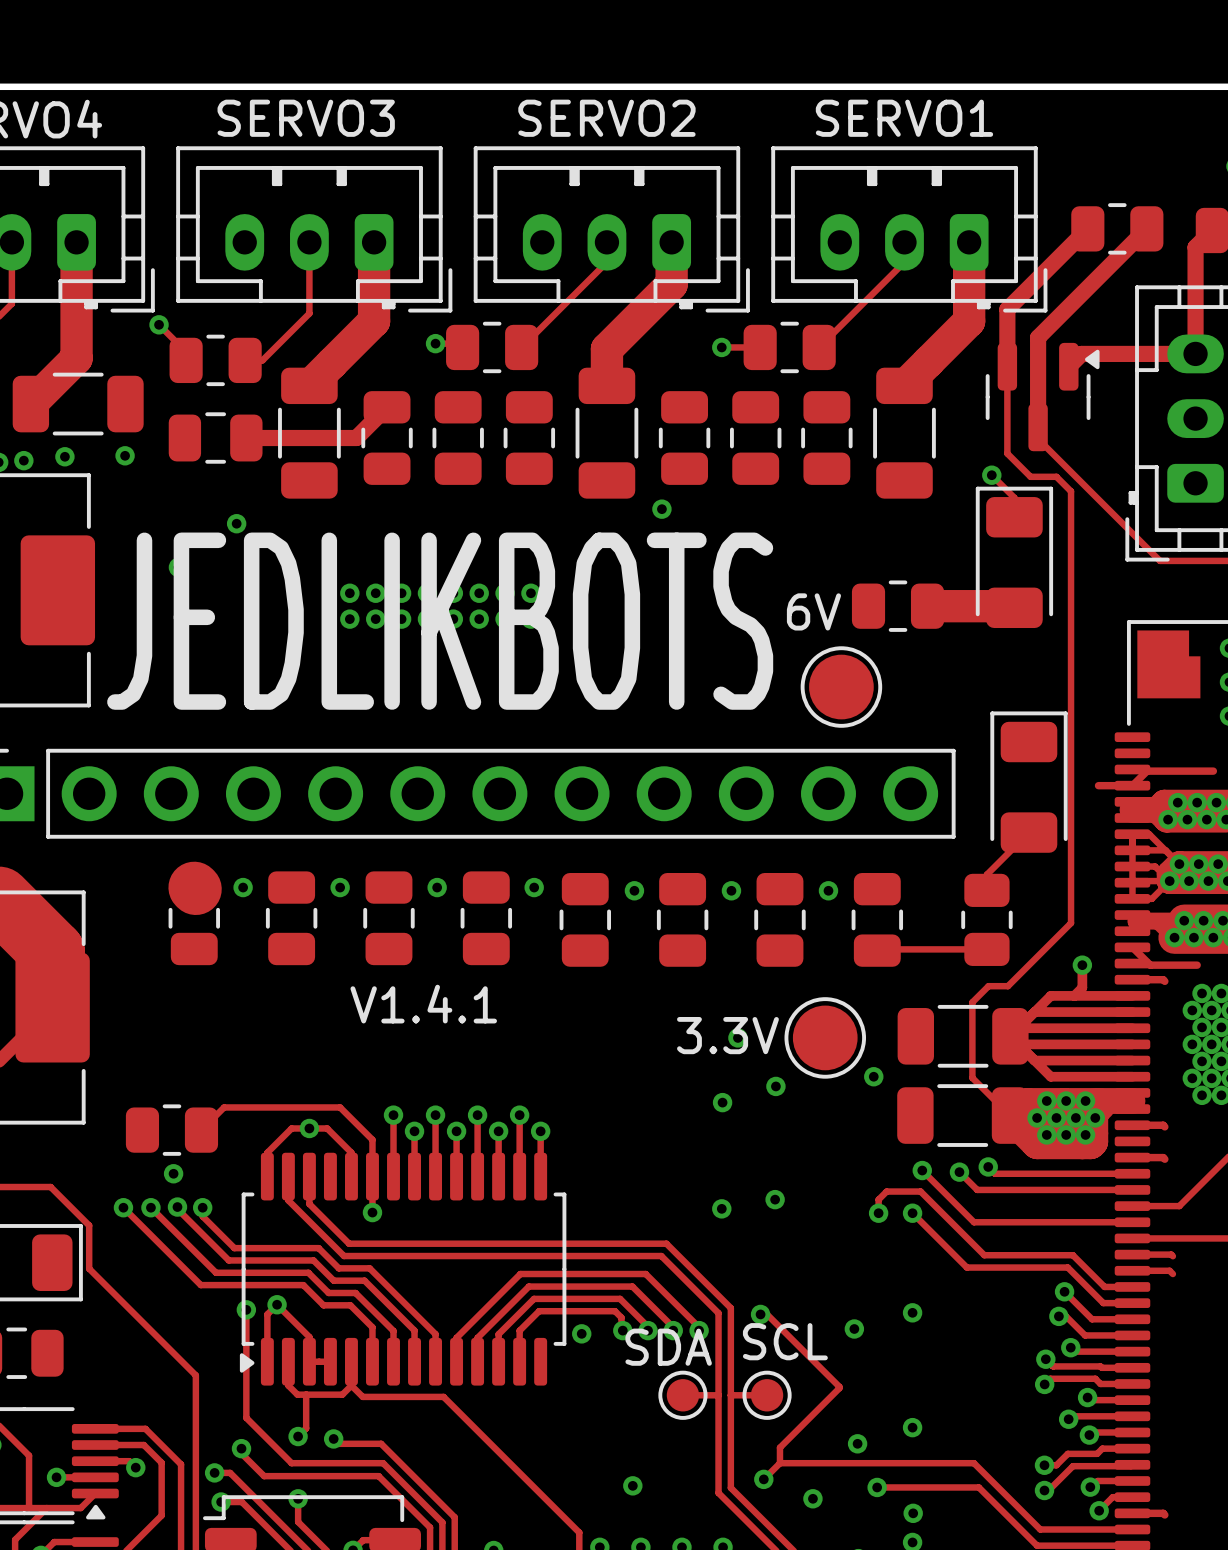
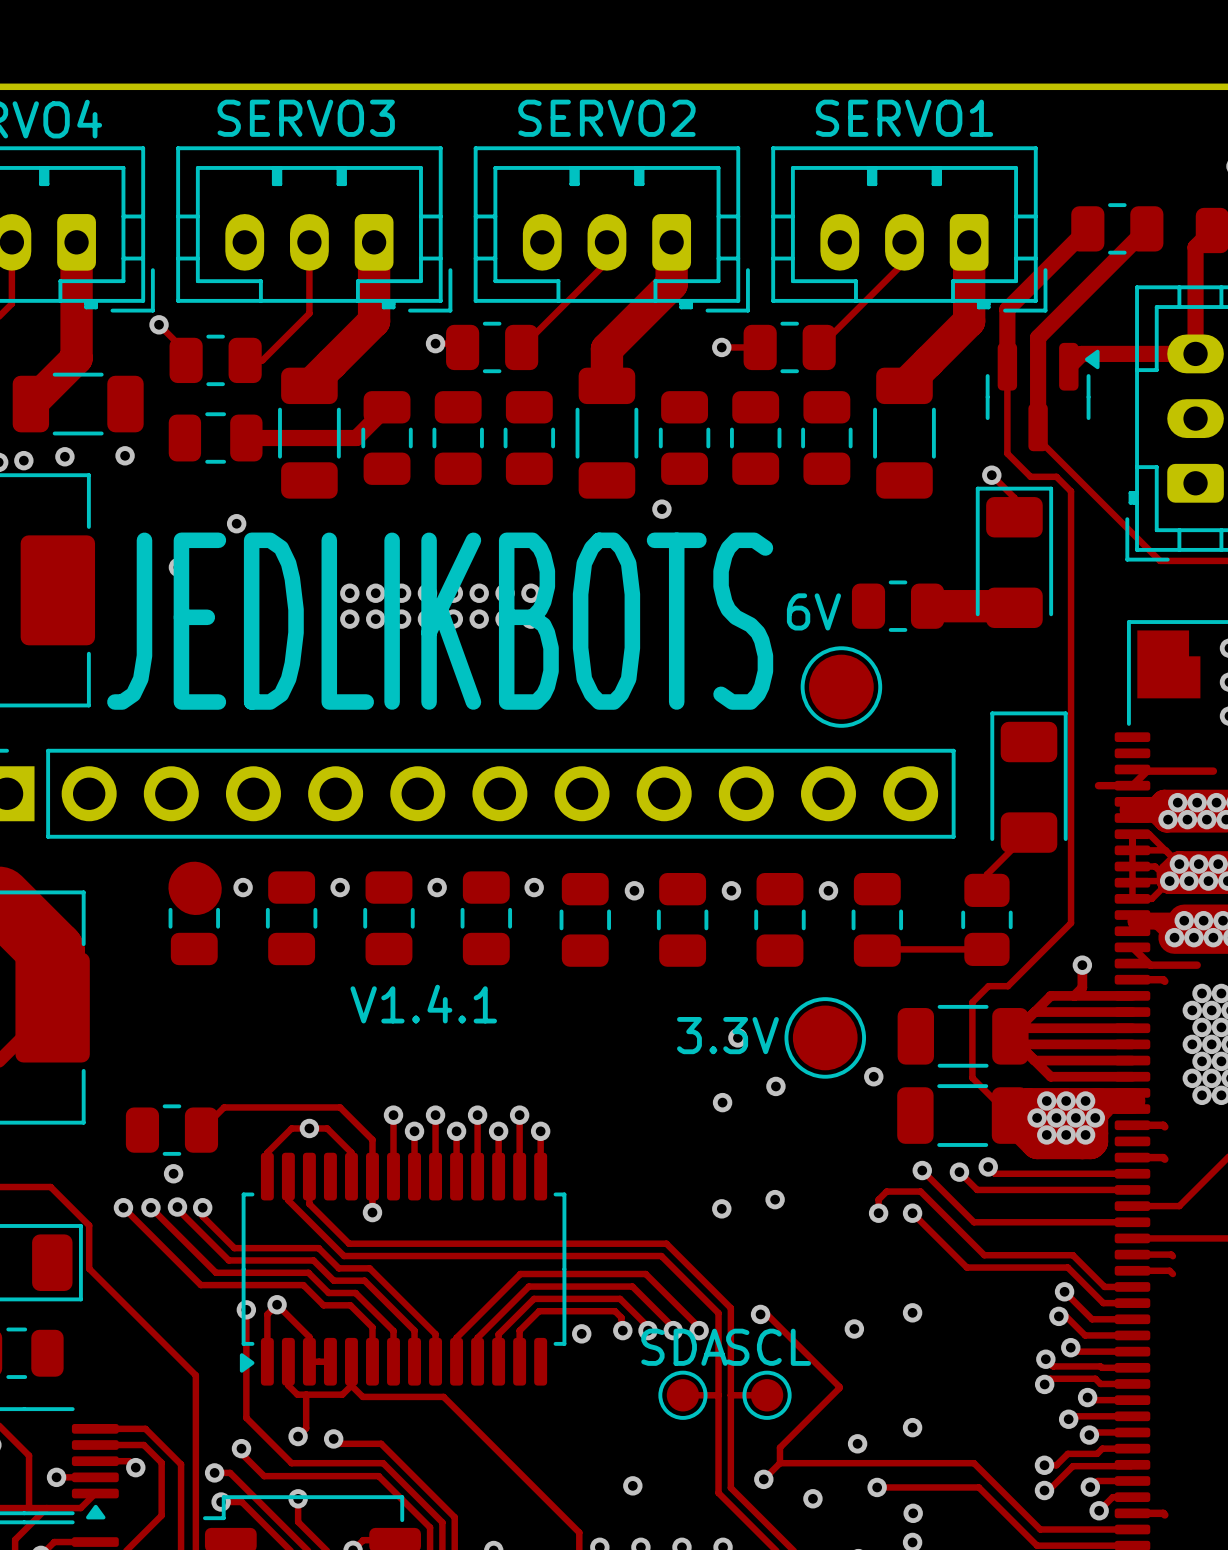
SCL name position: SCL (785, 1341) -> SCL (768, 1347)
SDA name position: SDA (668, 1347) -> SDA (684, 1347)

